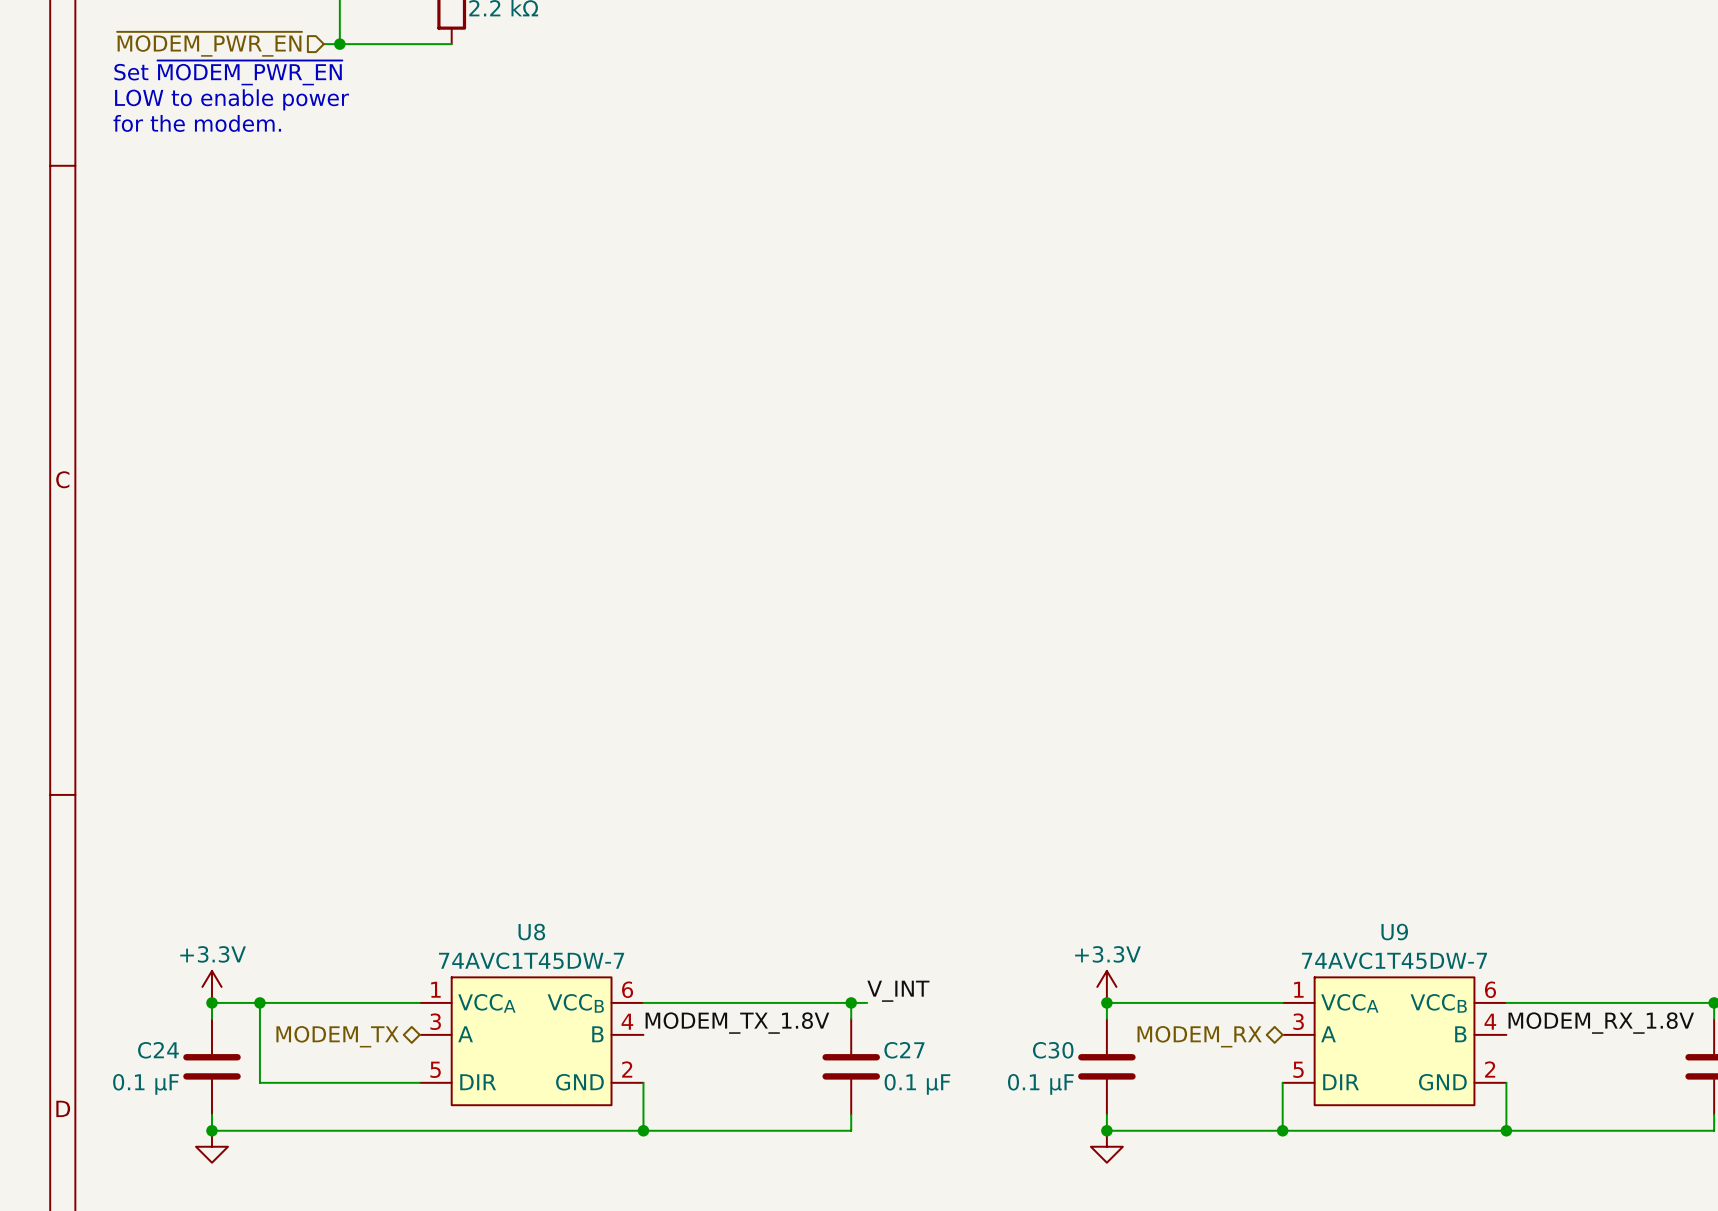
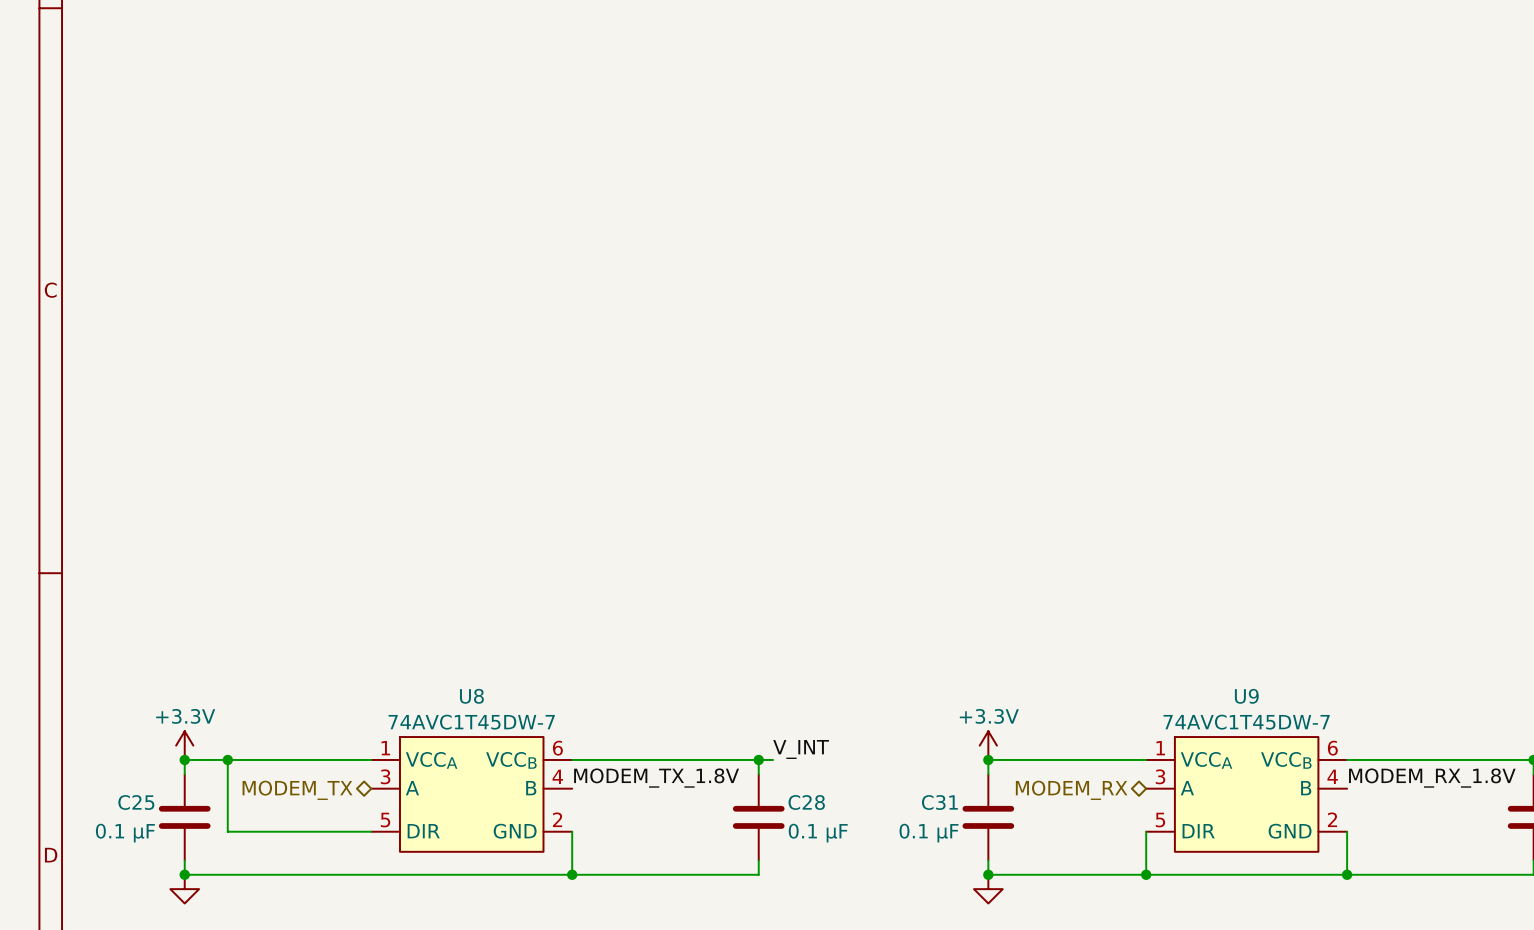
C24 name: C24 (158, 1050) -> C25 (136, 802)
C27 name: C27 (904, 1050) -> C28 (806, 802)
C30 name: C30 (1053, 1050) -> C31 (939, 802)

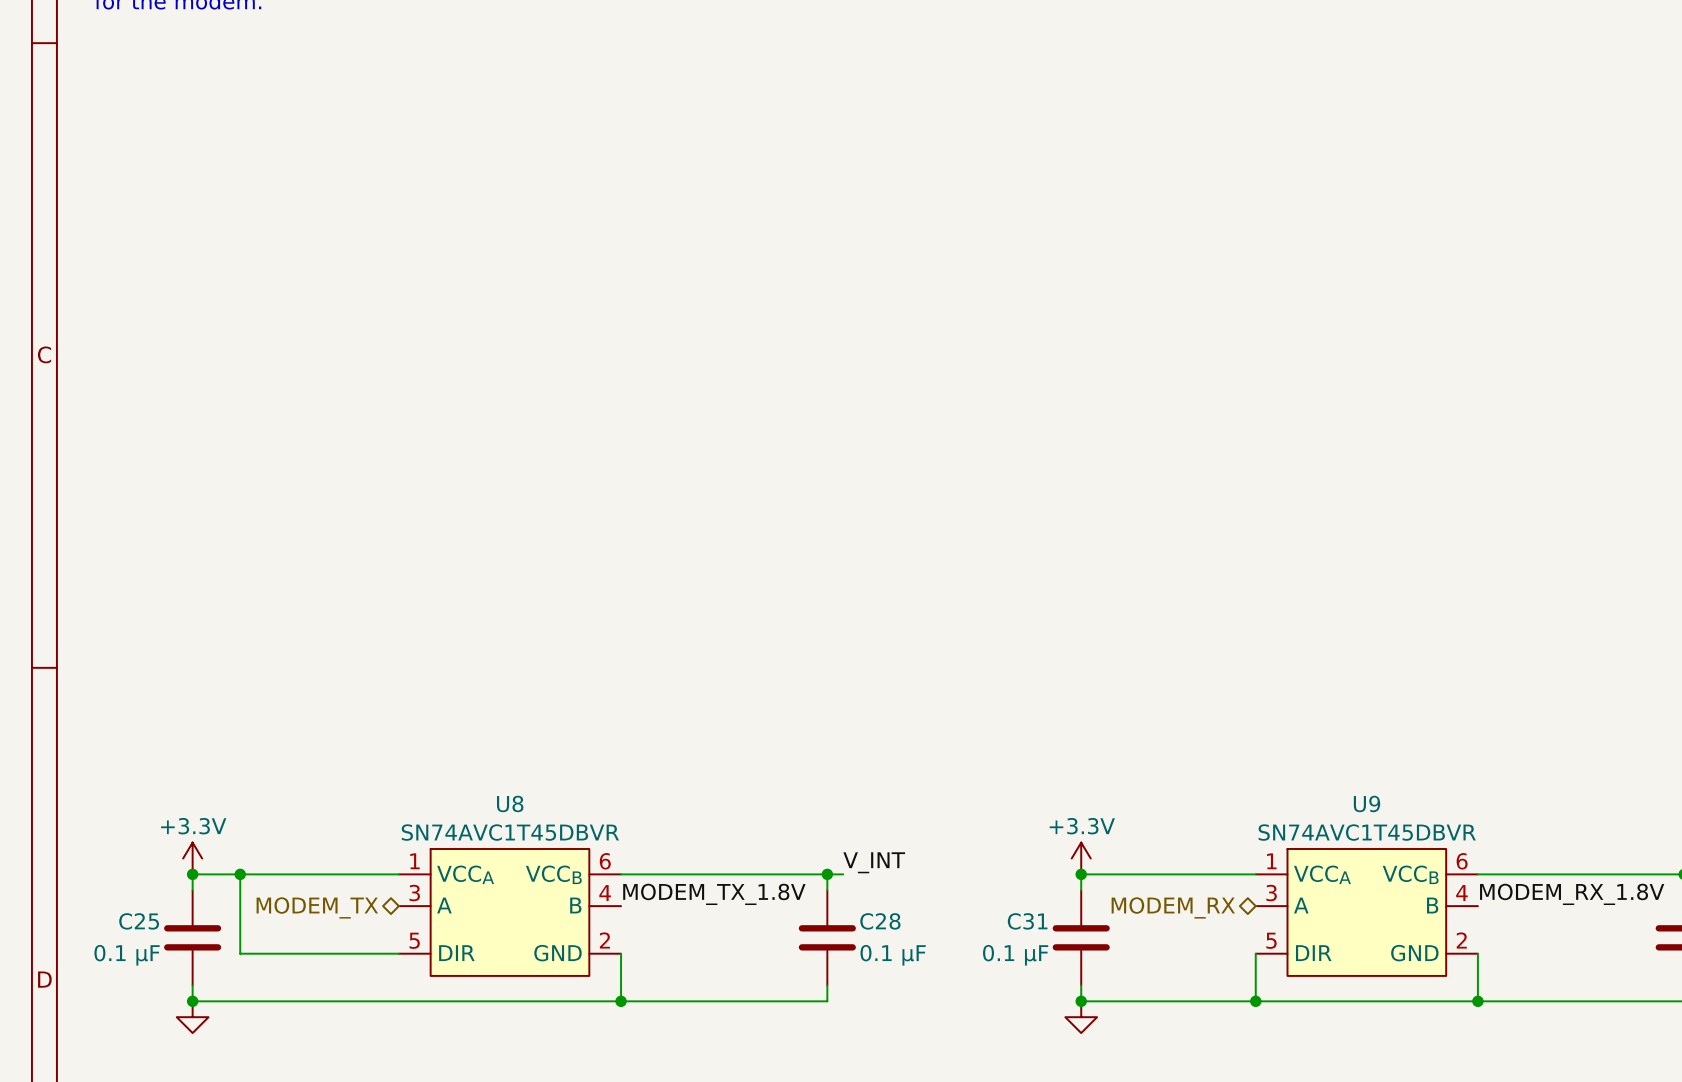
U8 value: 74AVC1T45DW-7 (471, 722) -> SN74AVC1T45DBVR (510, 832)
U9 value: 74AVC1T45DW-7 (1246, 722) -> SN74AVC1T45DBVR (1367, 832)

